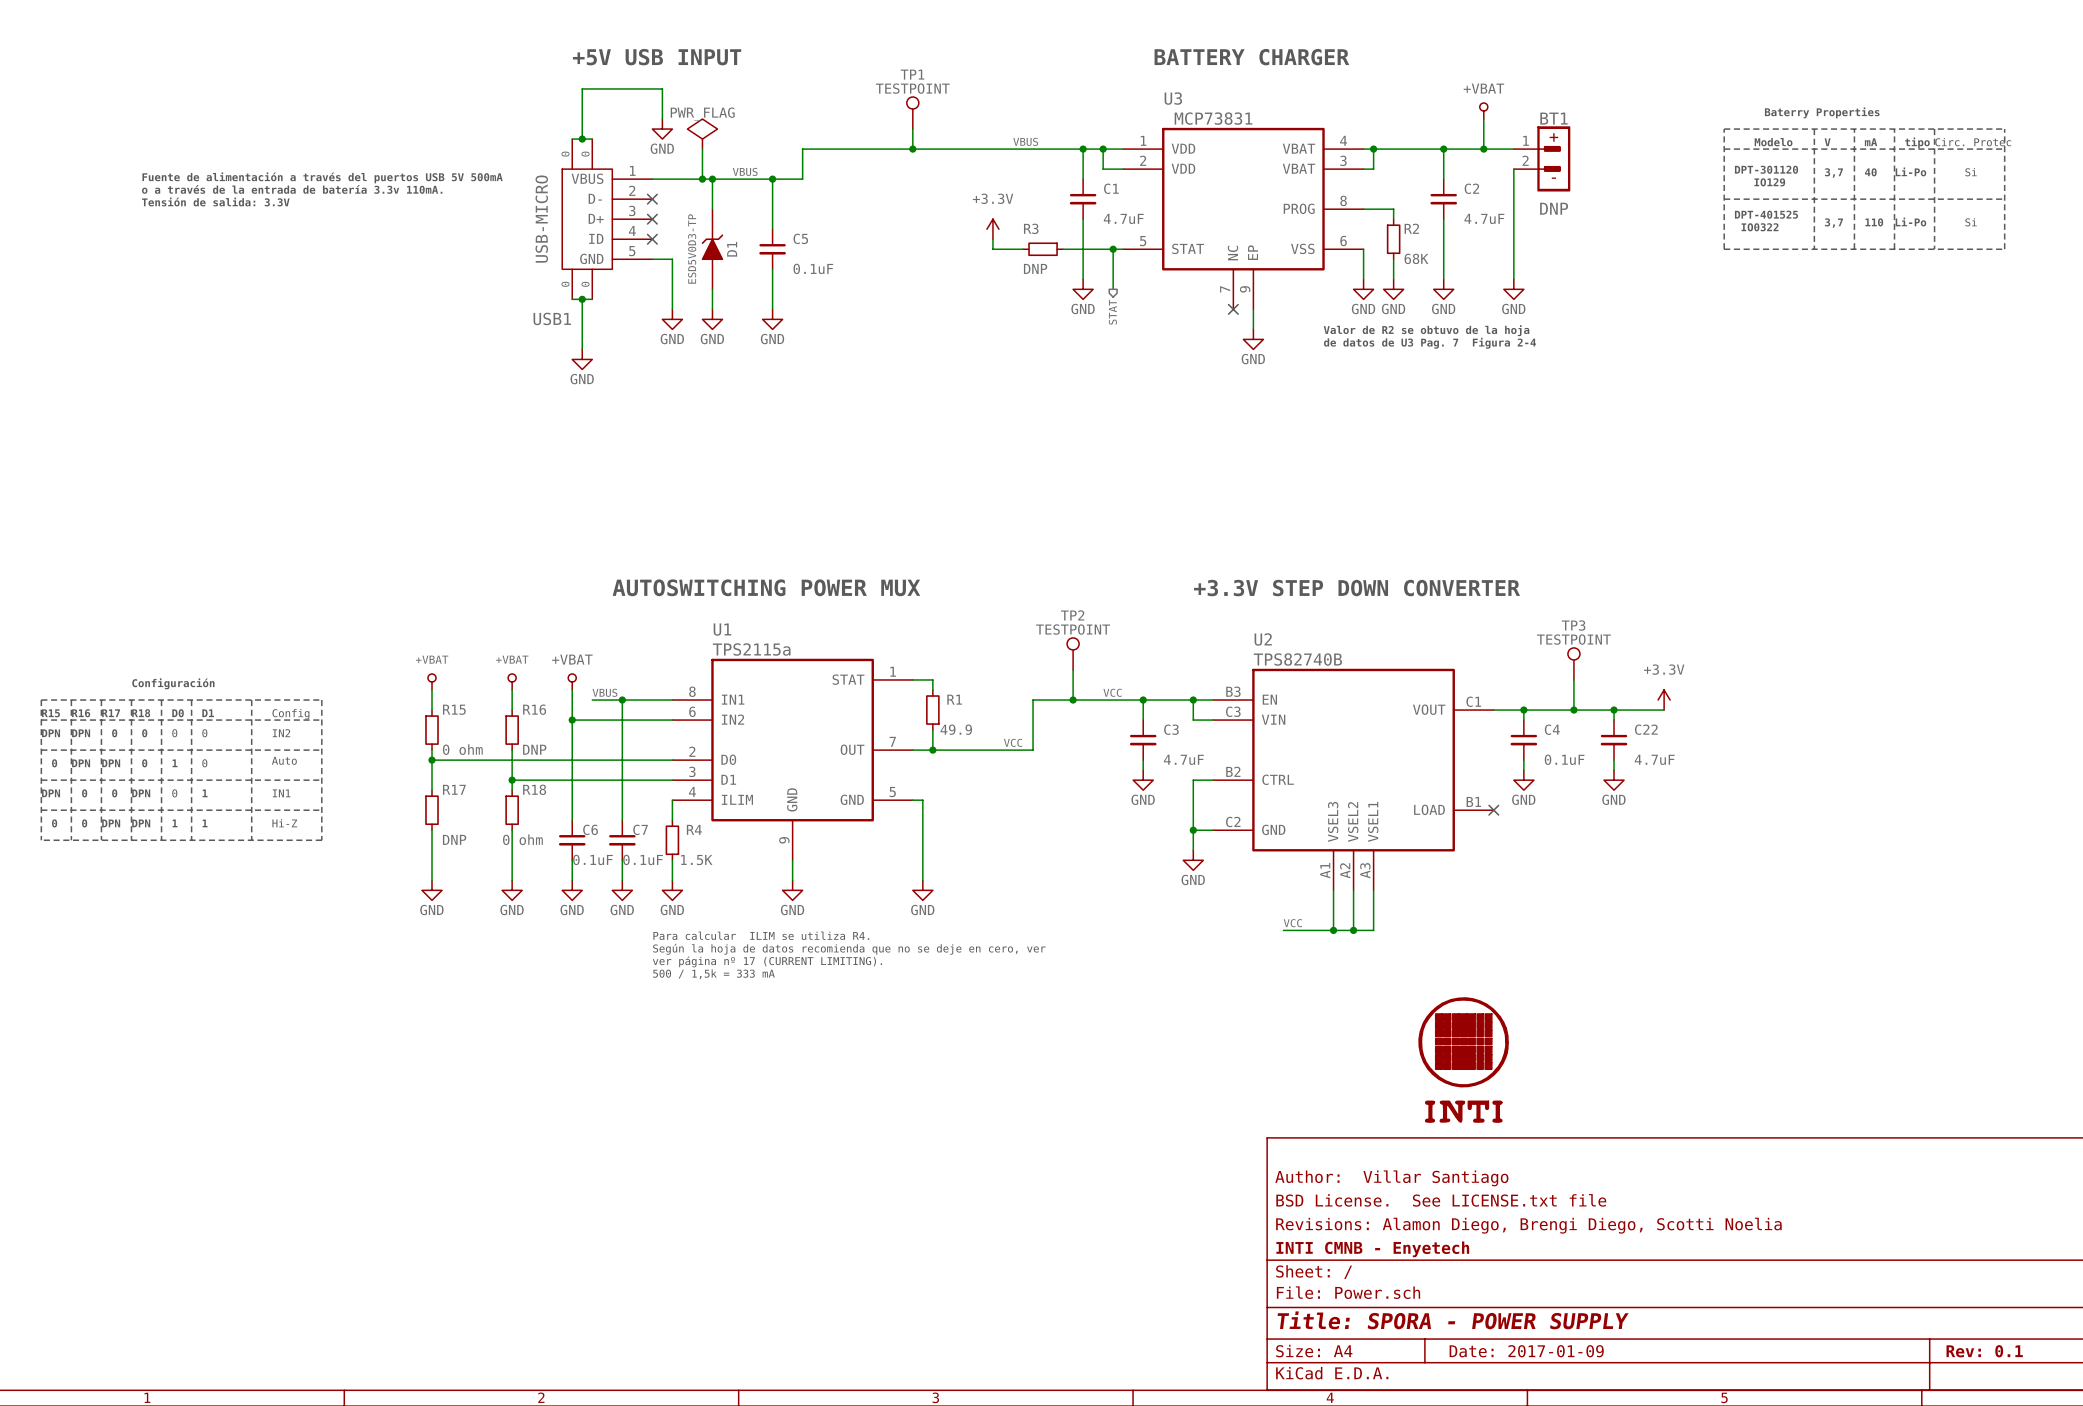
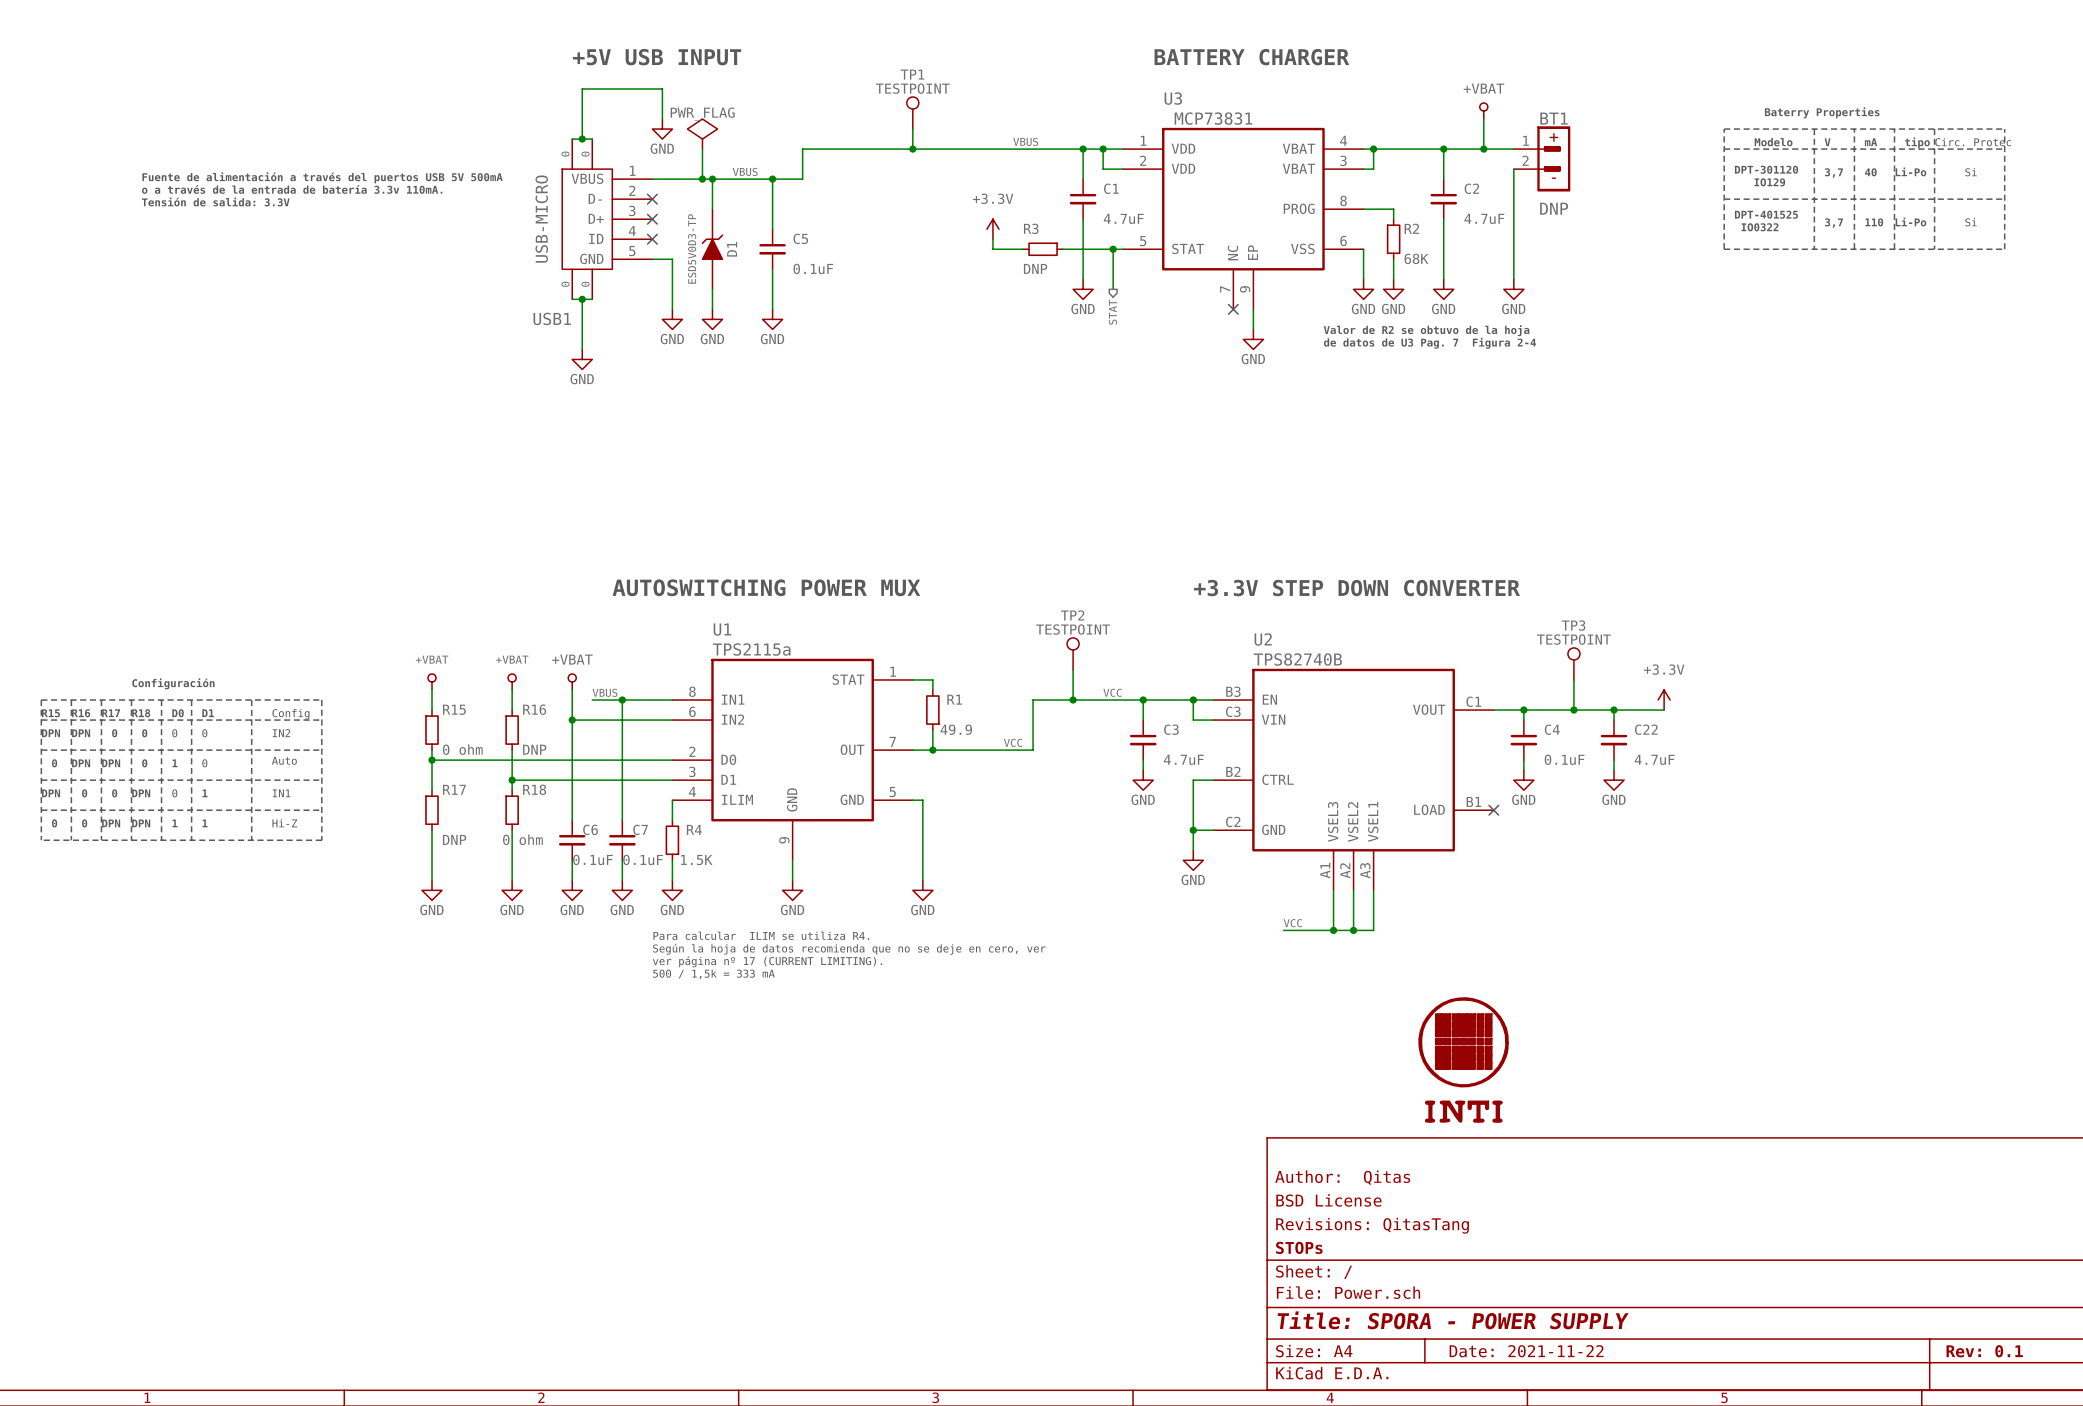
title block: Author: Villar Santiago (1391, 1178) -> Author: Qitas (1342, 1177)
title block: BSD License. See LICENSE.txt file (1441, 1200) -> BSD License (1328, 1200)
title block: Revisions: Alamon Diego, Brengi Diego, Scotti Noelia (1528, 1225) -> Revisions: QitasTang (1372, 1225)
title block: INTI CMNB - Enyetech (1372, 1249) -> STOPs (1299, 1247)
title block: Date: 2017-01-09 (1526, 1351) -> Date: 2021-11-22 (1526, 1351)

